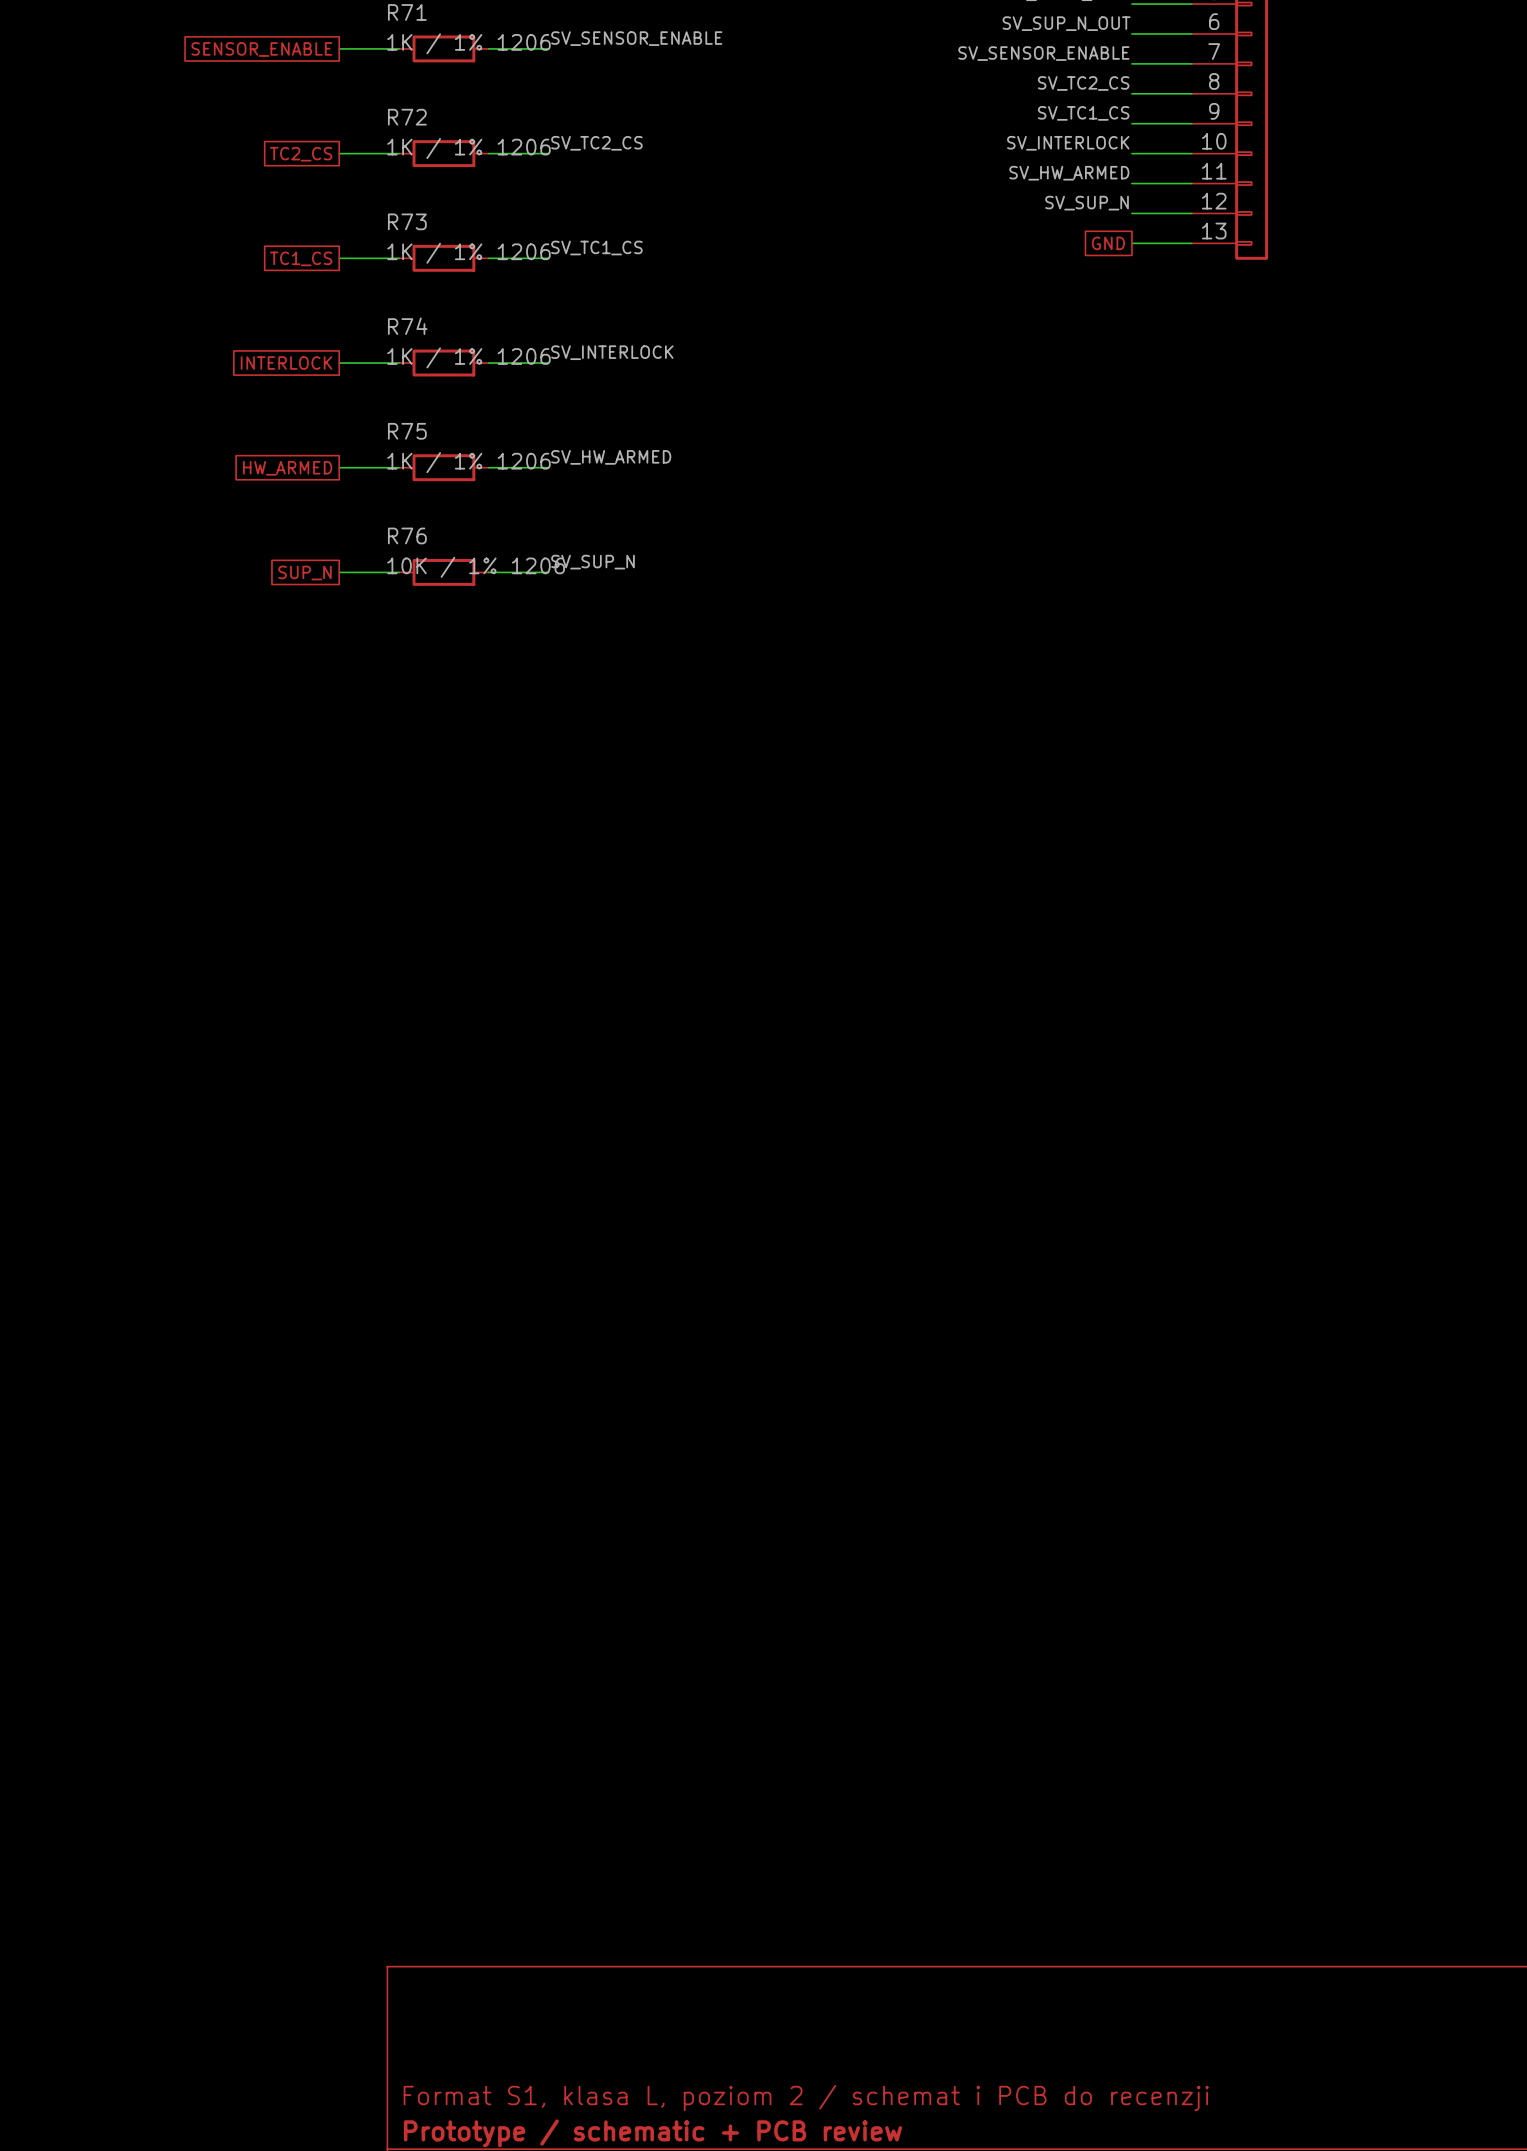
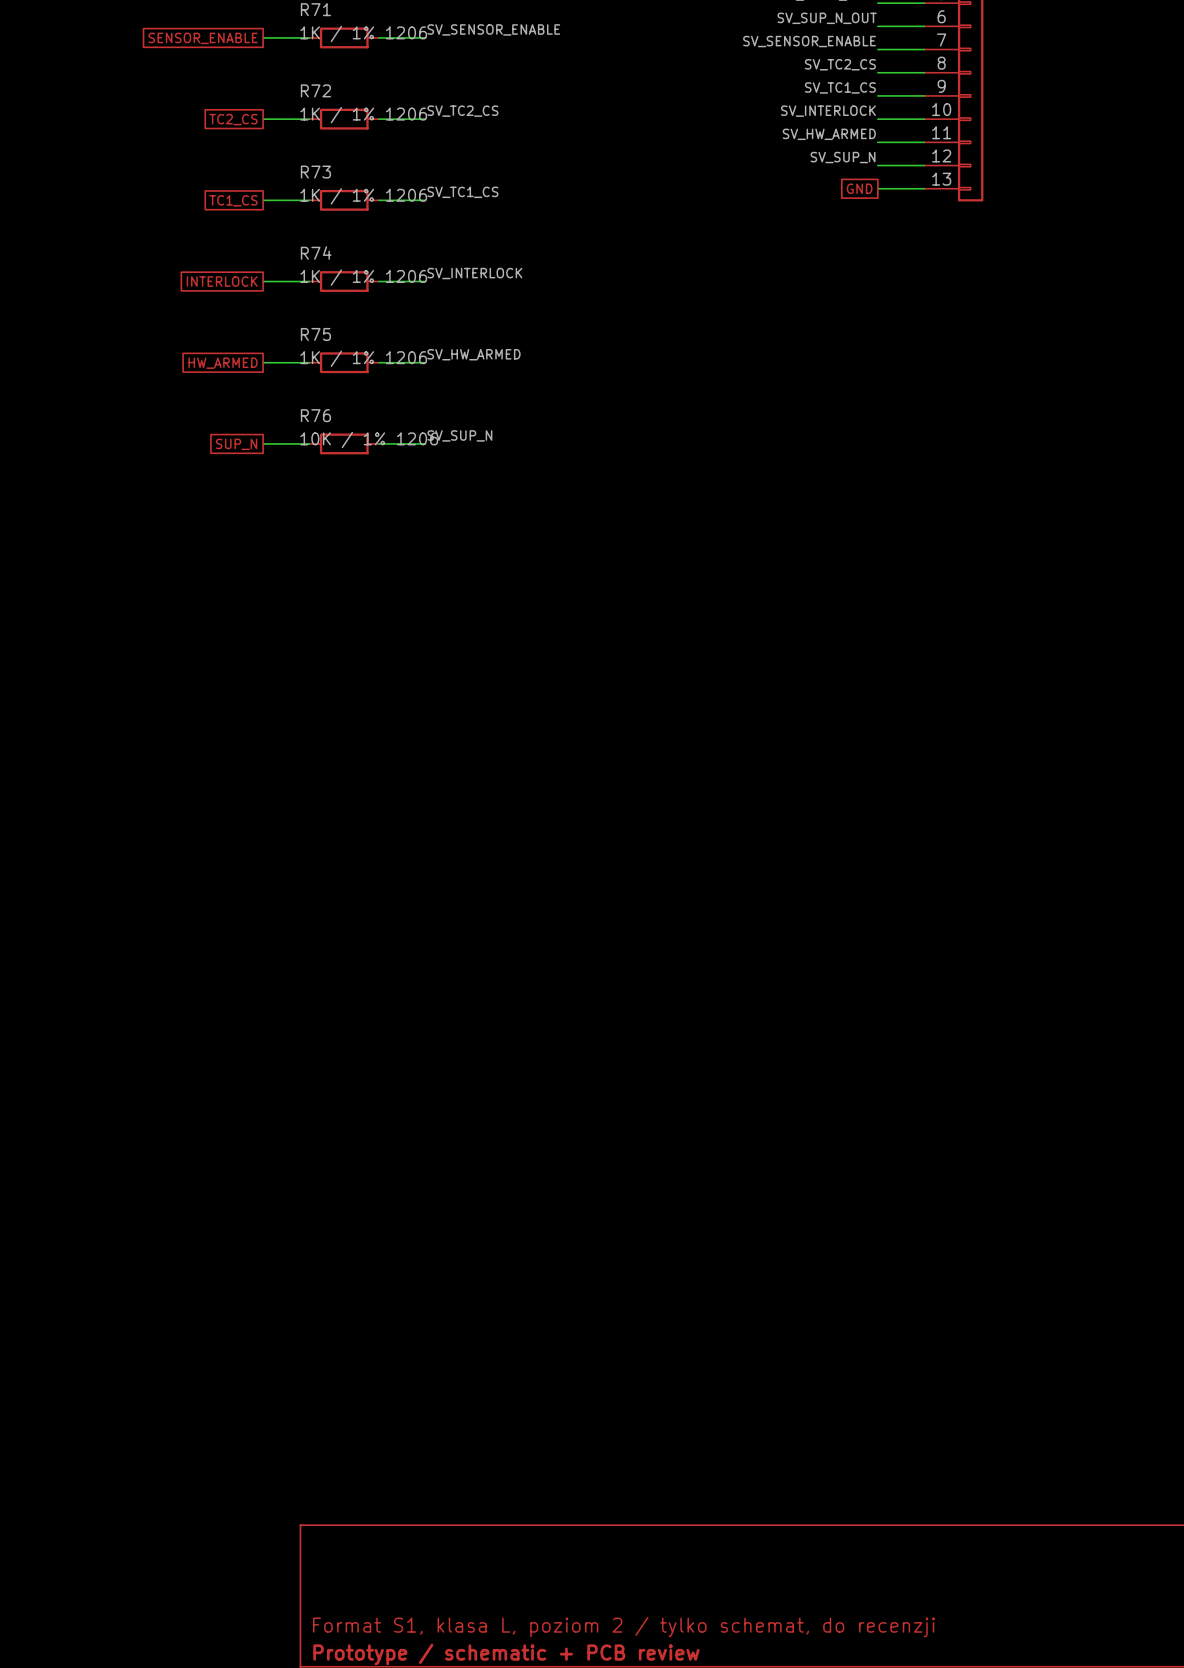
title block: Format S1, klasa L, poziom 2 / schemat i PCB do recenzji (806, 2098) -> Format S1, klasa L, poziom 2 / tylko schemat, do recenzji (623, 1627)

